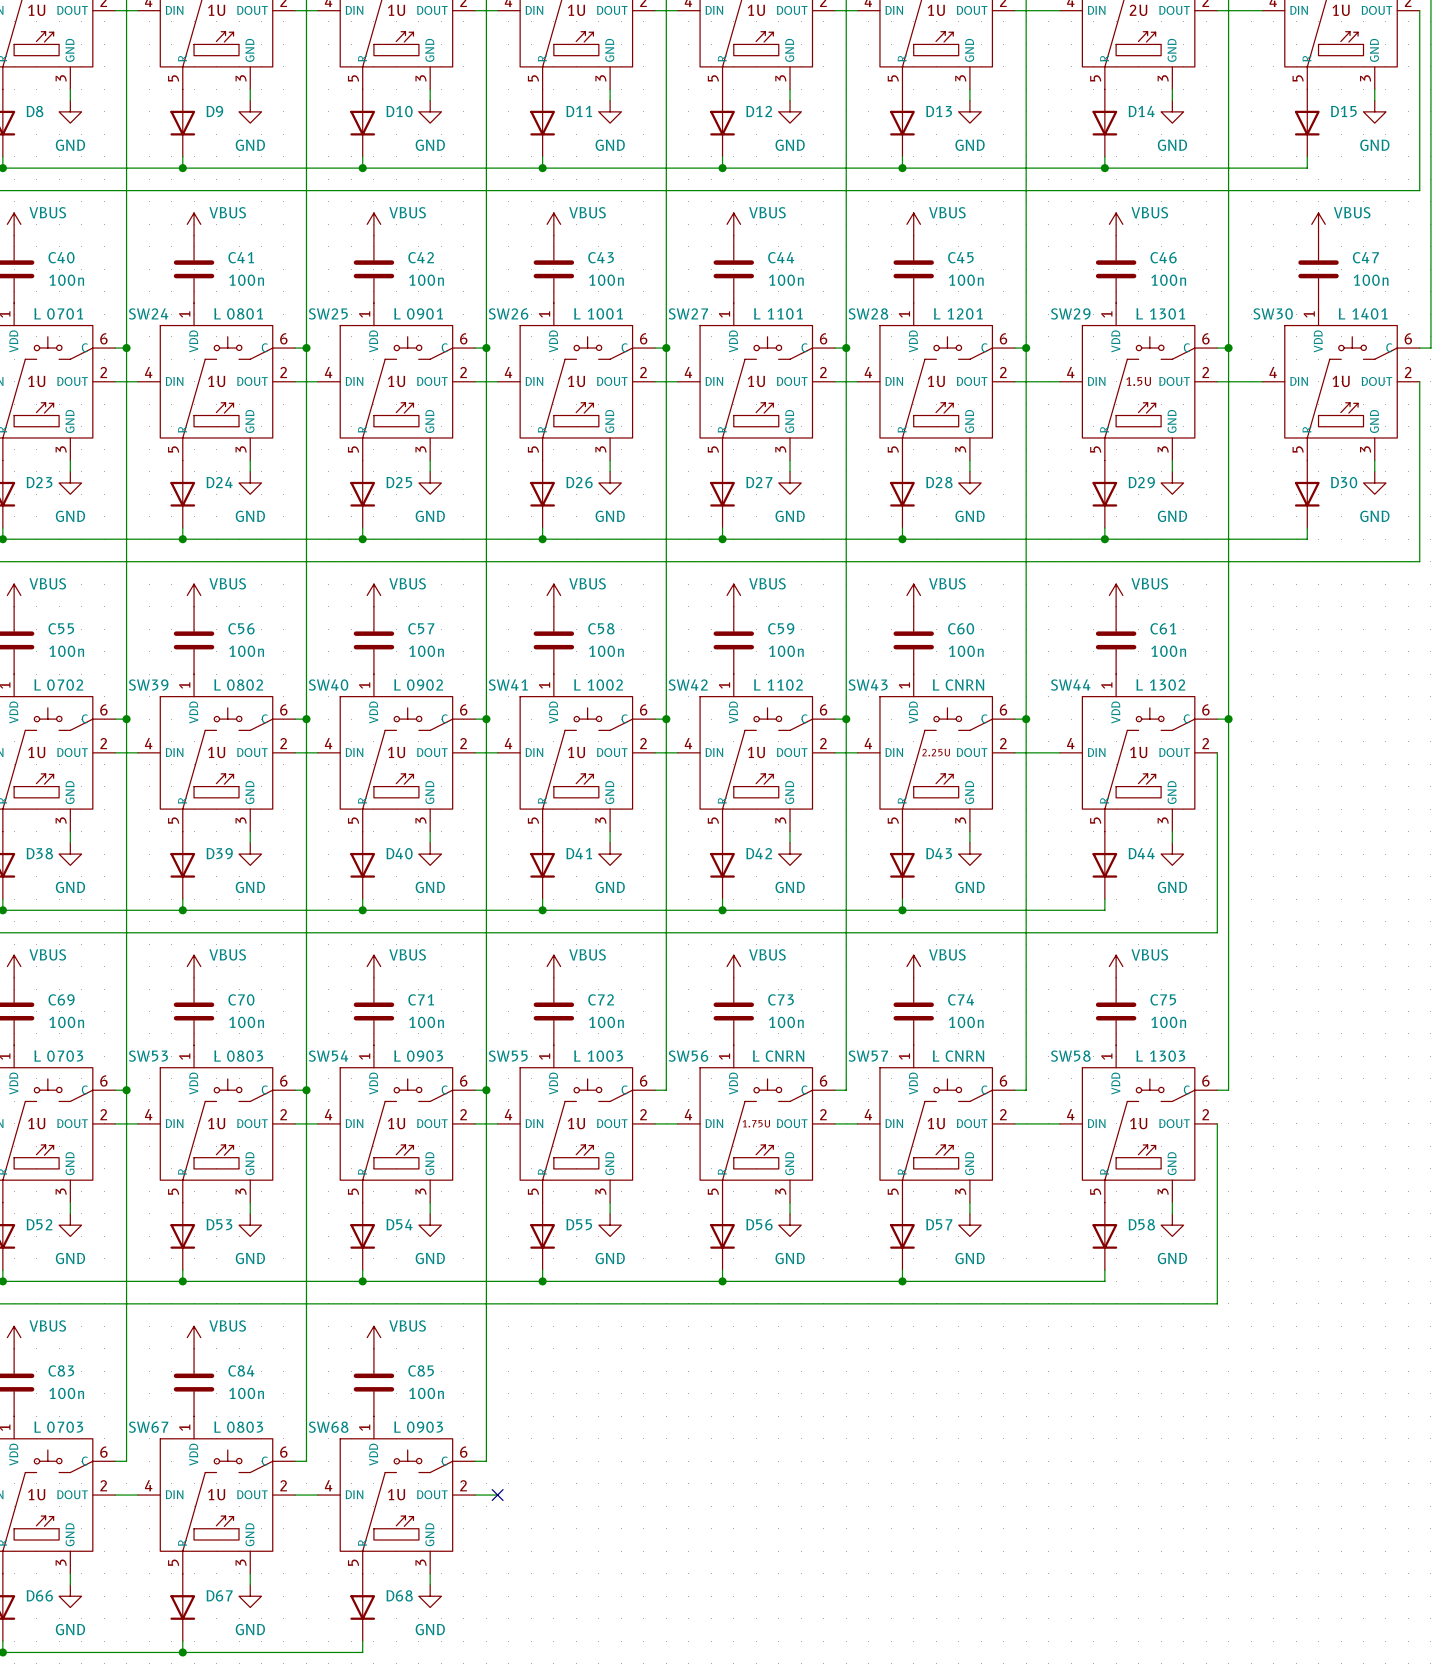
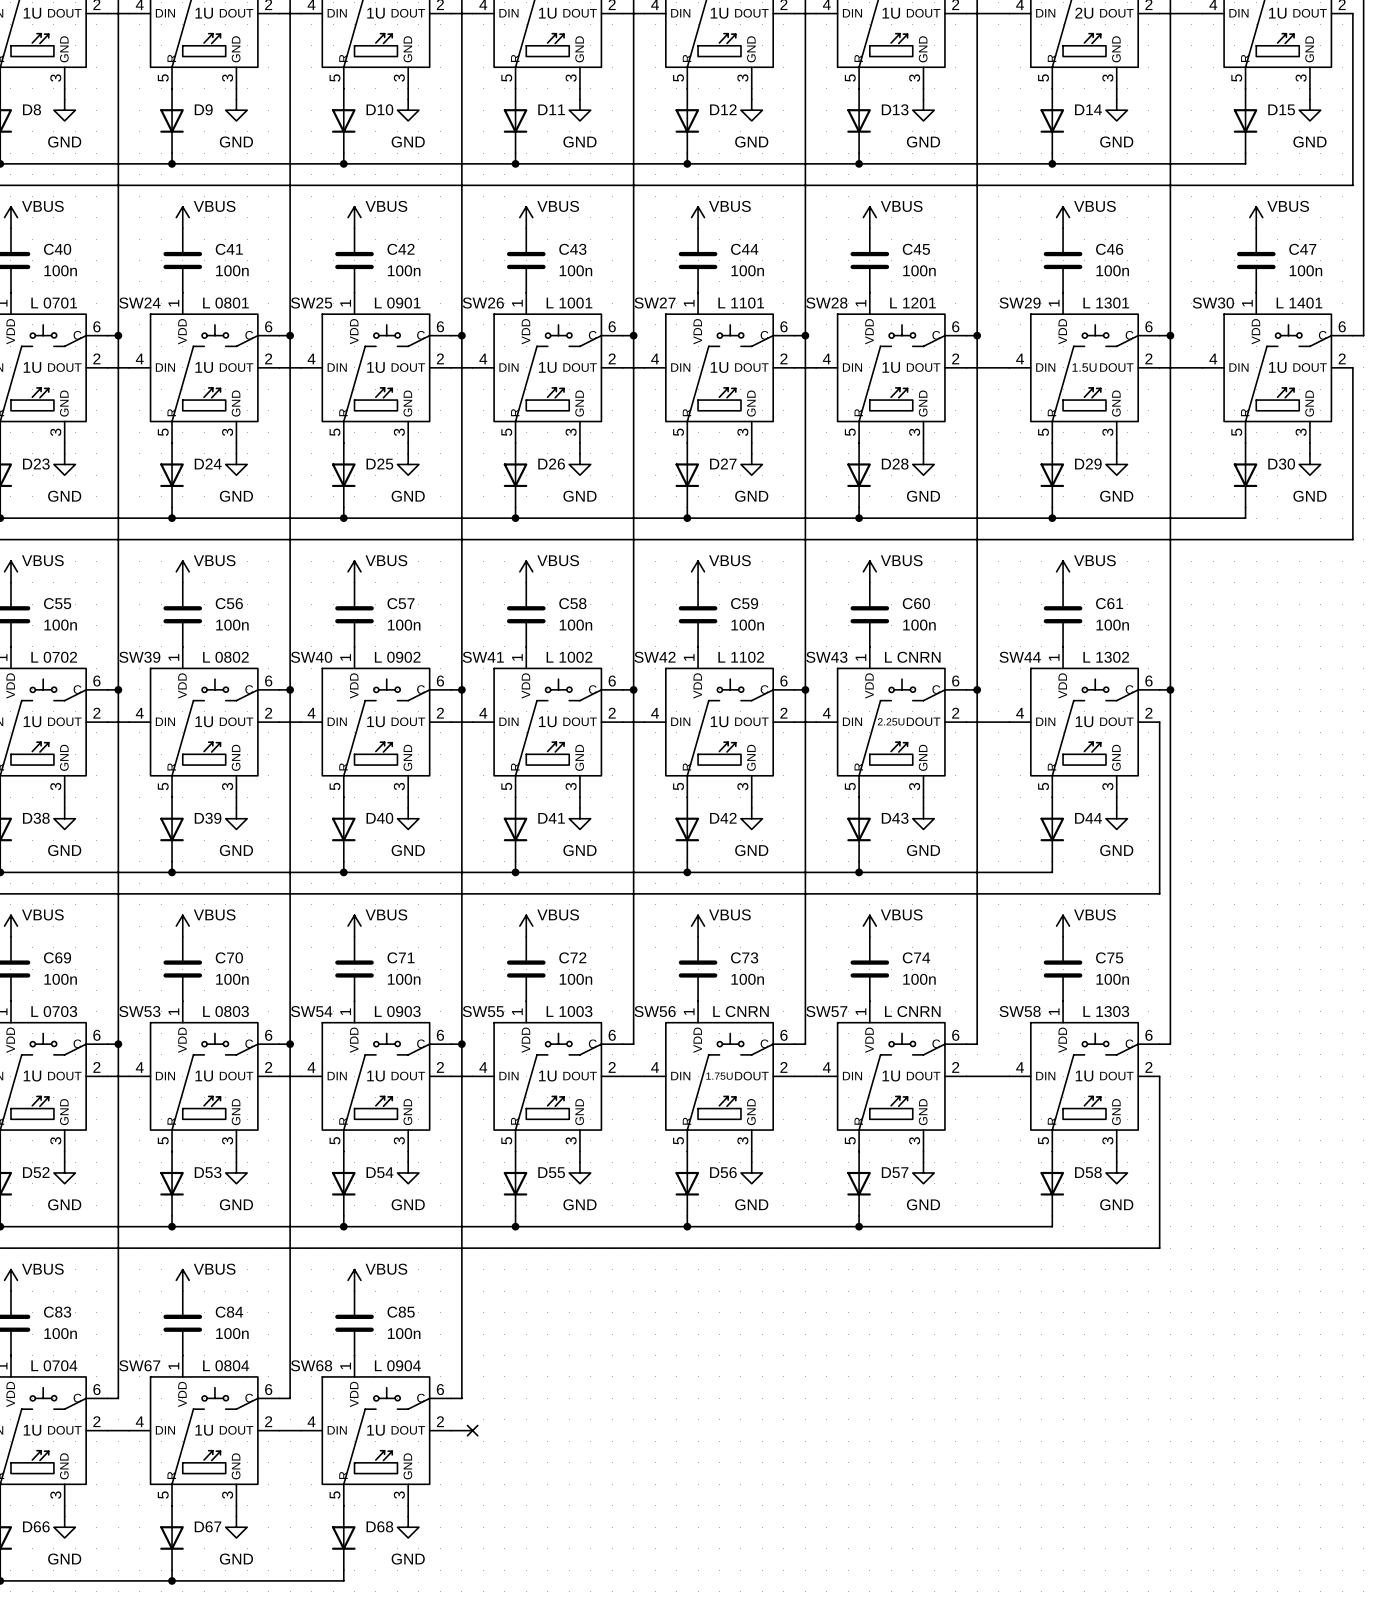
part text: L 0703 (58, 1427) -> L 0704 (54, 1365)
SW67 text: L 0803 (238, 1427) -> L 0804 (226, 1365)
SW68 text: L 0903 (418, 1427) -> L 0904 (397, 1365)

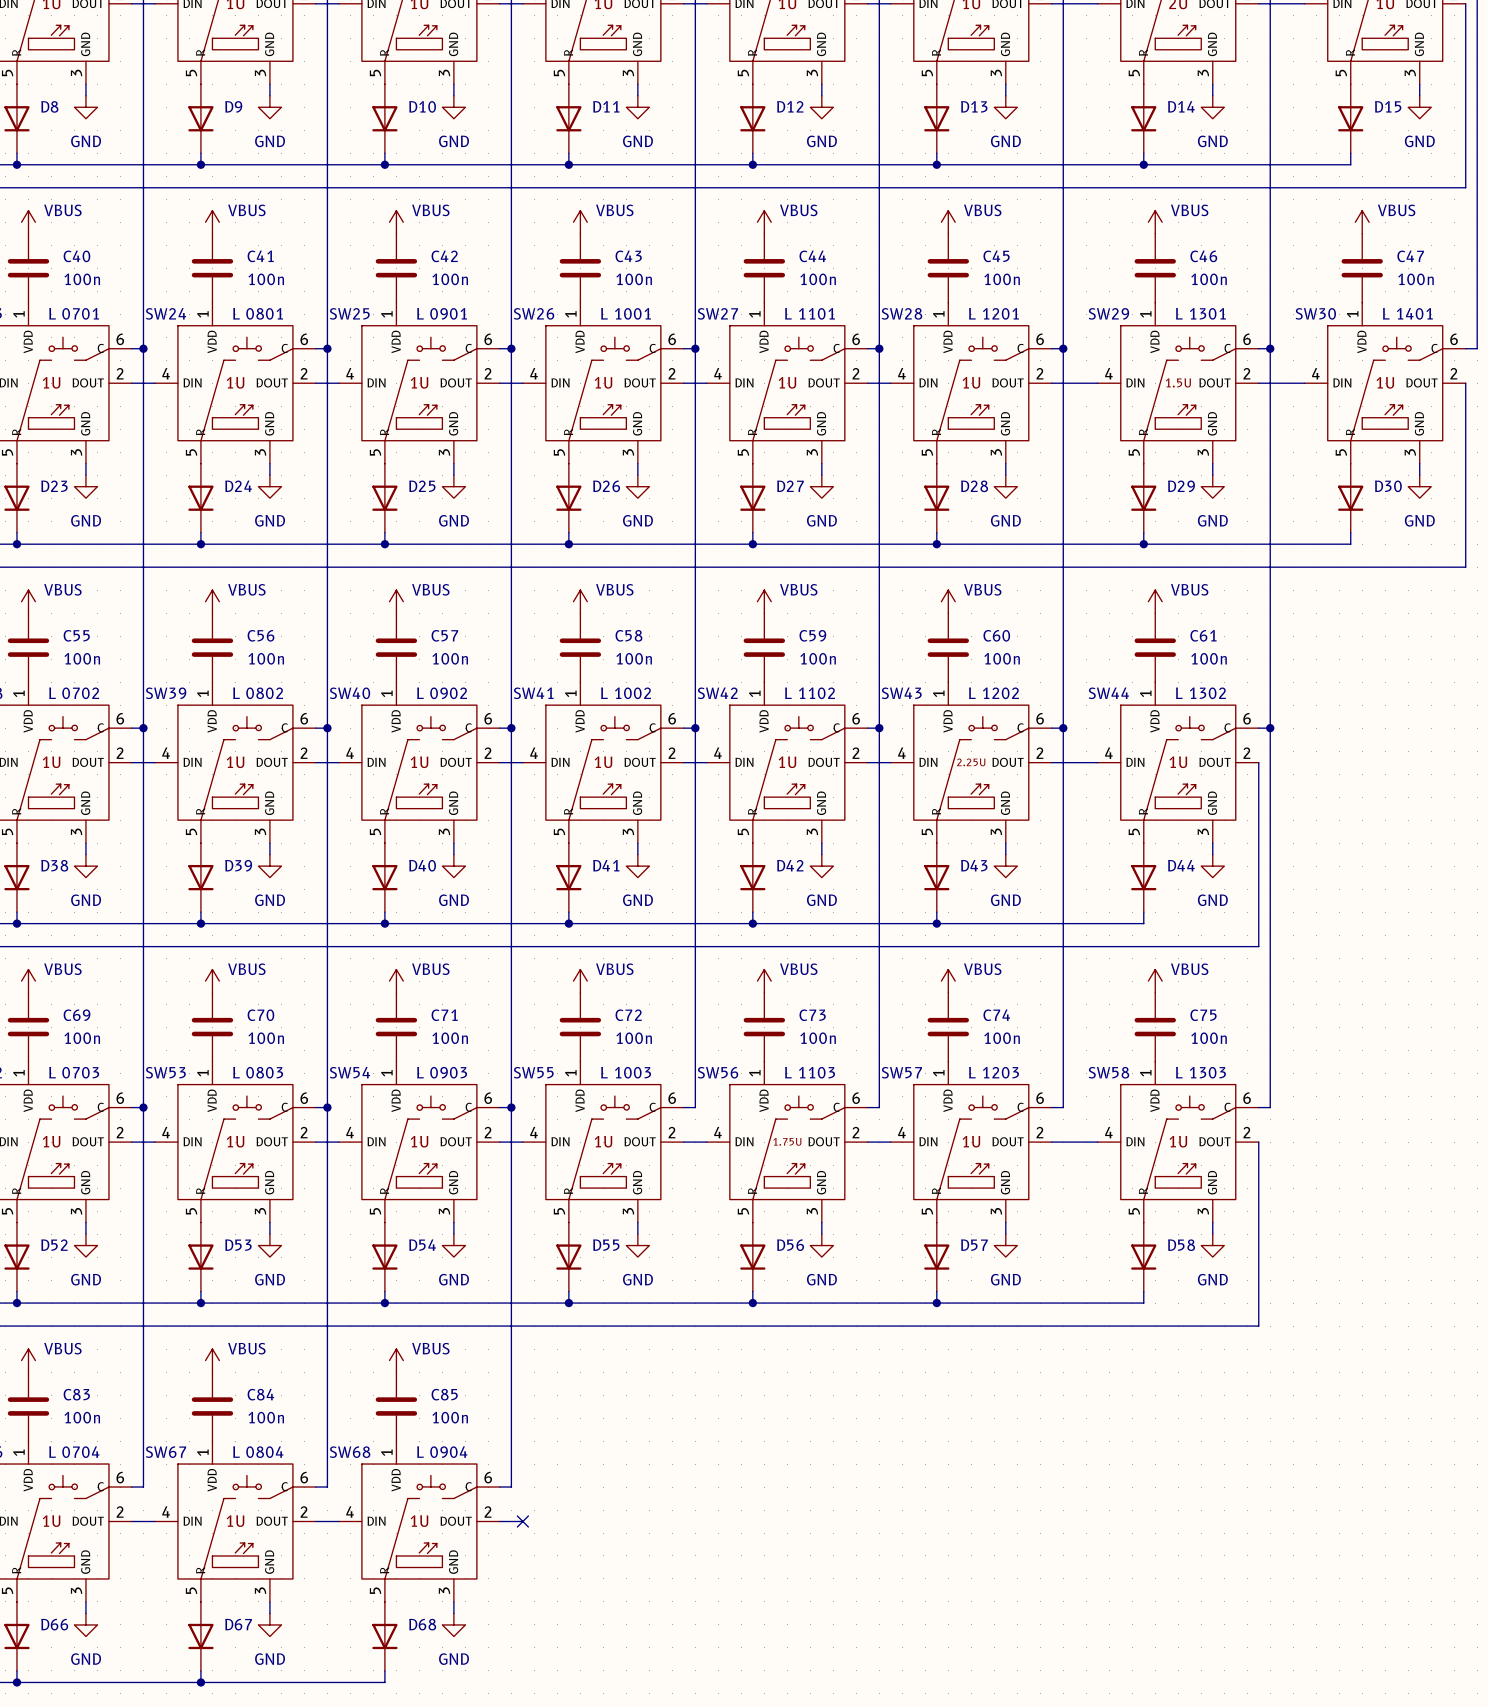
SW43 text: L CNRN (912, 657) -> L 1202 (993, 693)
SW56 text: L CNRN (740, 1011) -> L 1103 (810, 1072)
SW57 text: L CNRN (912, 1011) -> L 1203 (993, 1072)

